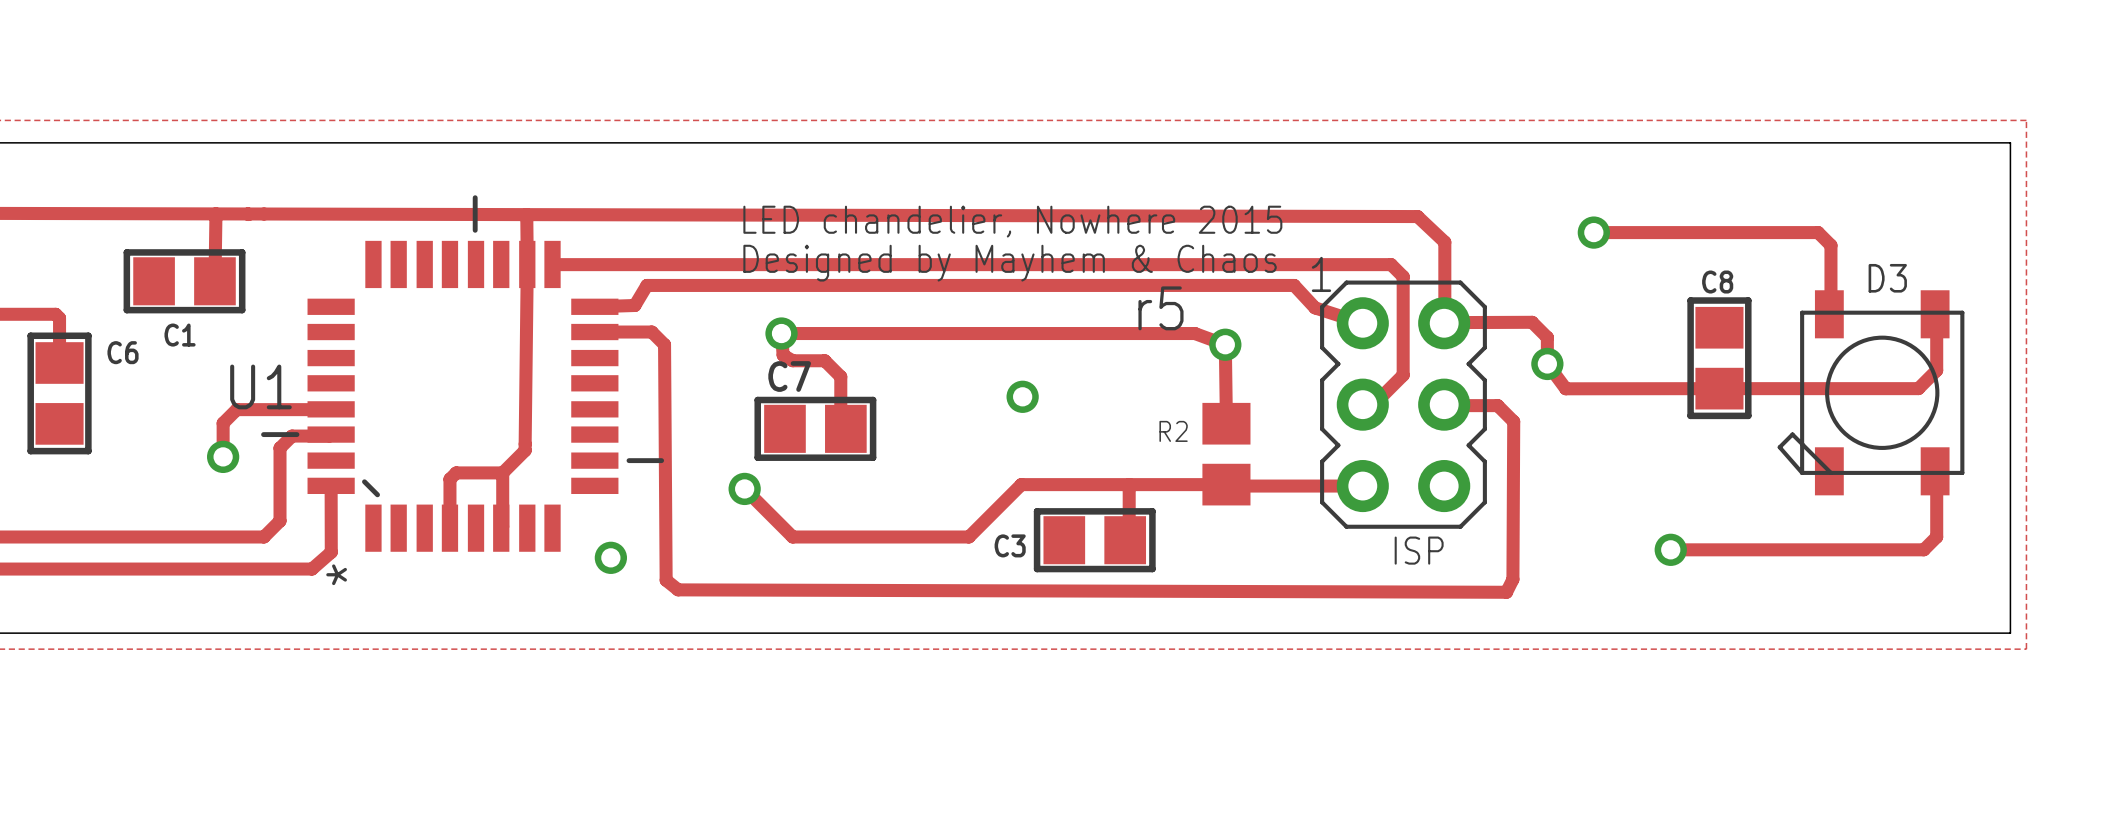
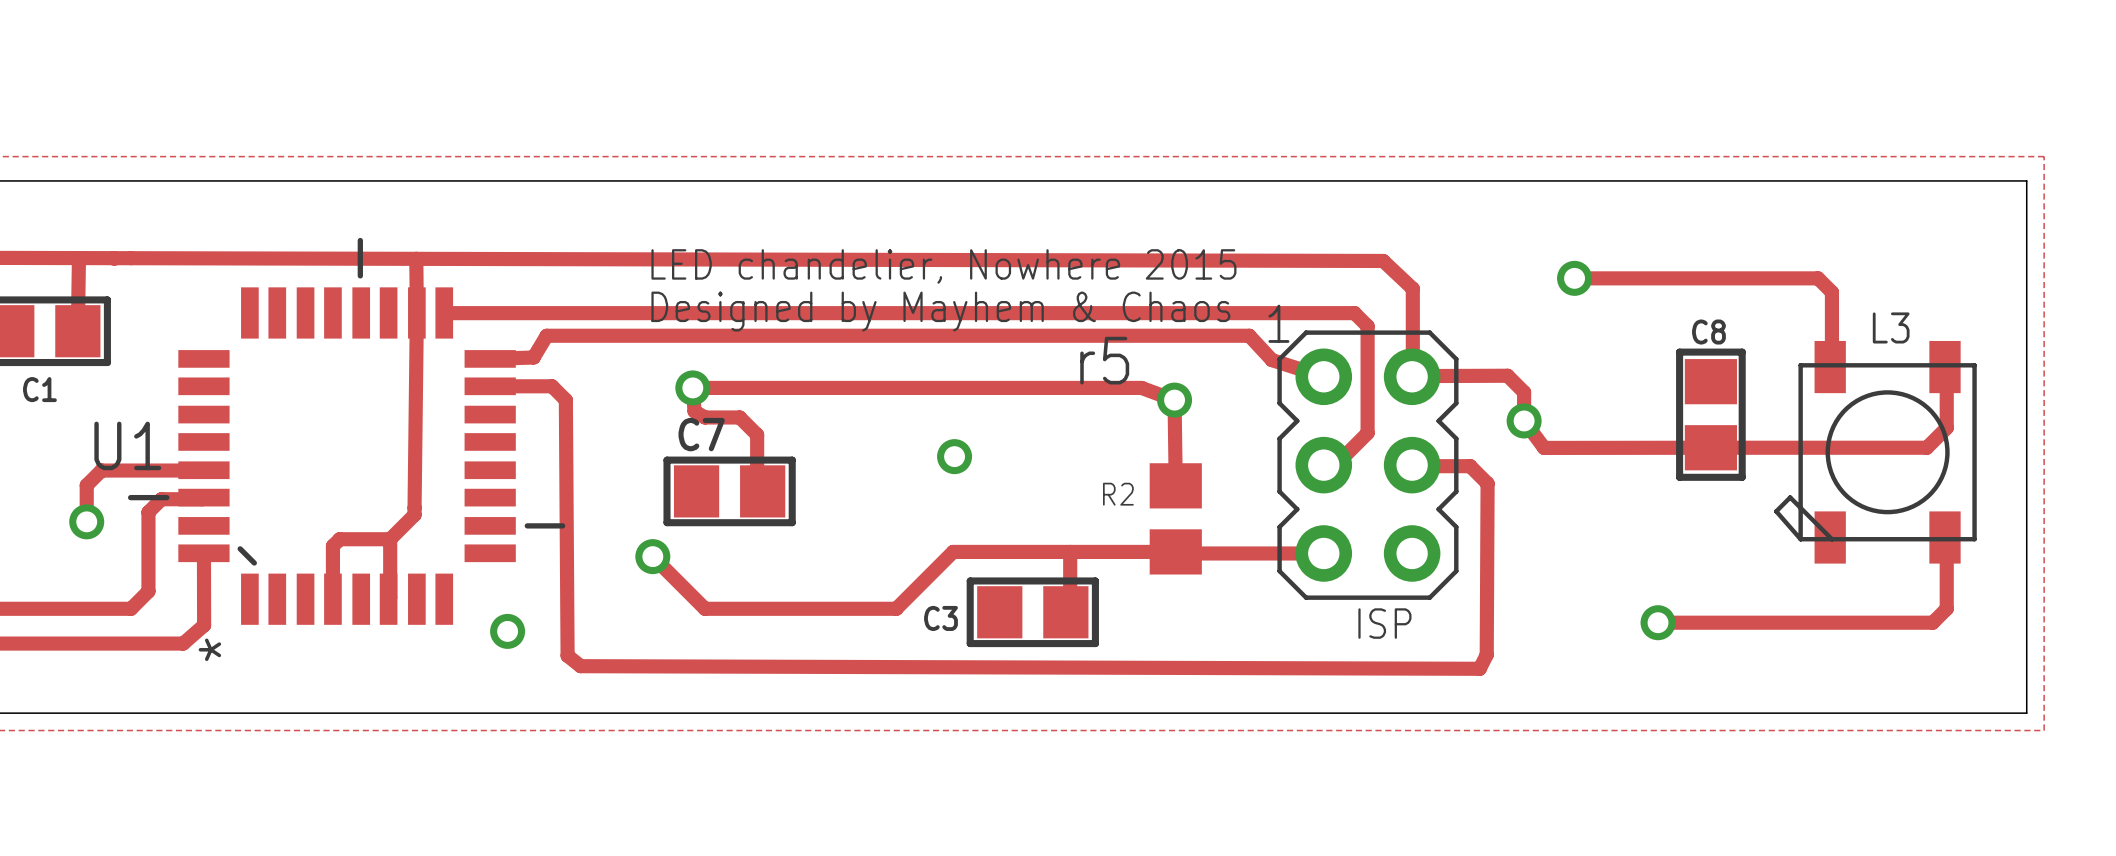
D3 name: D3 (1887, 278) -> L3 (1891, 327)

